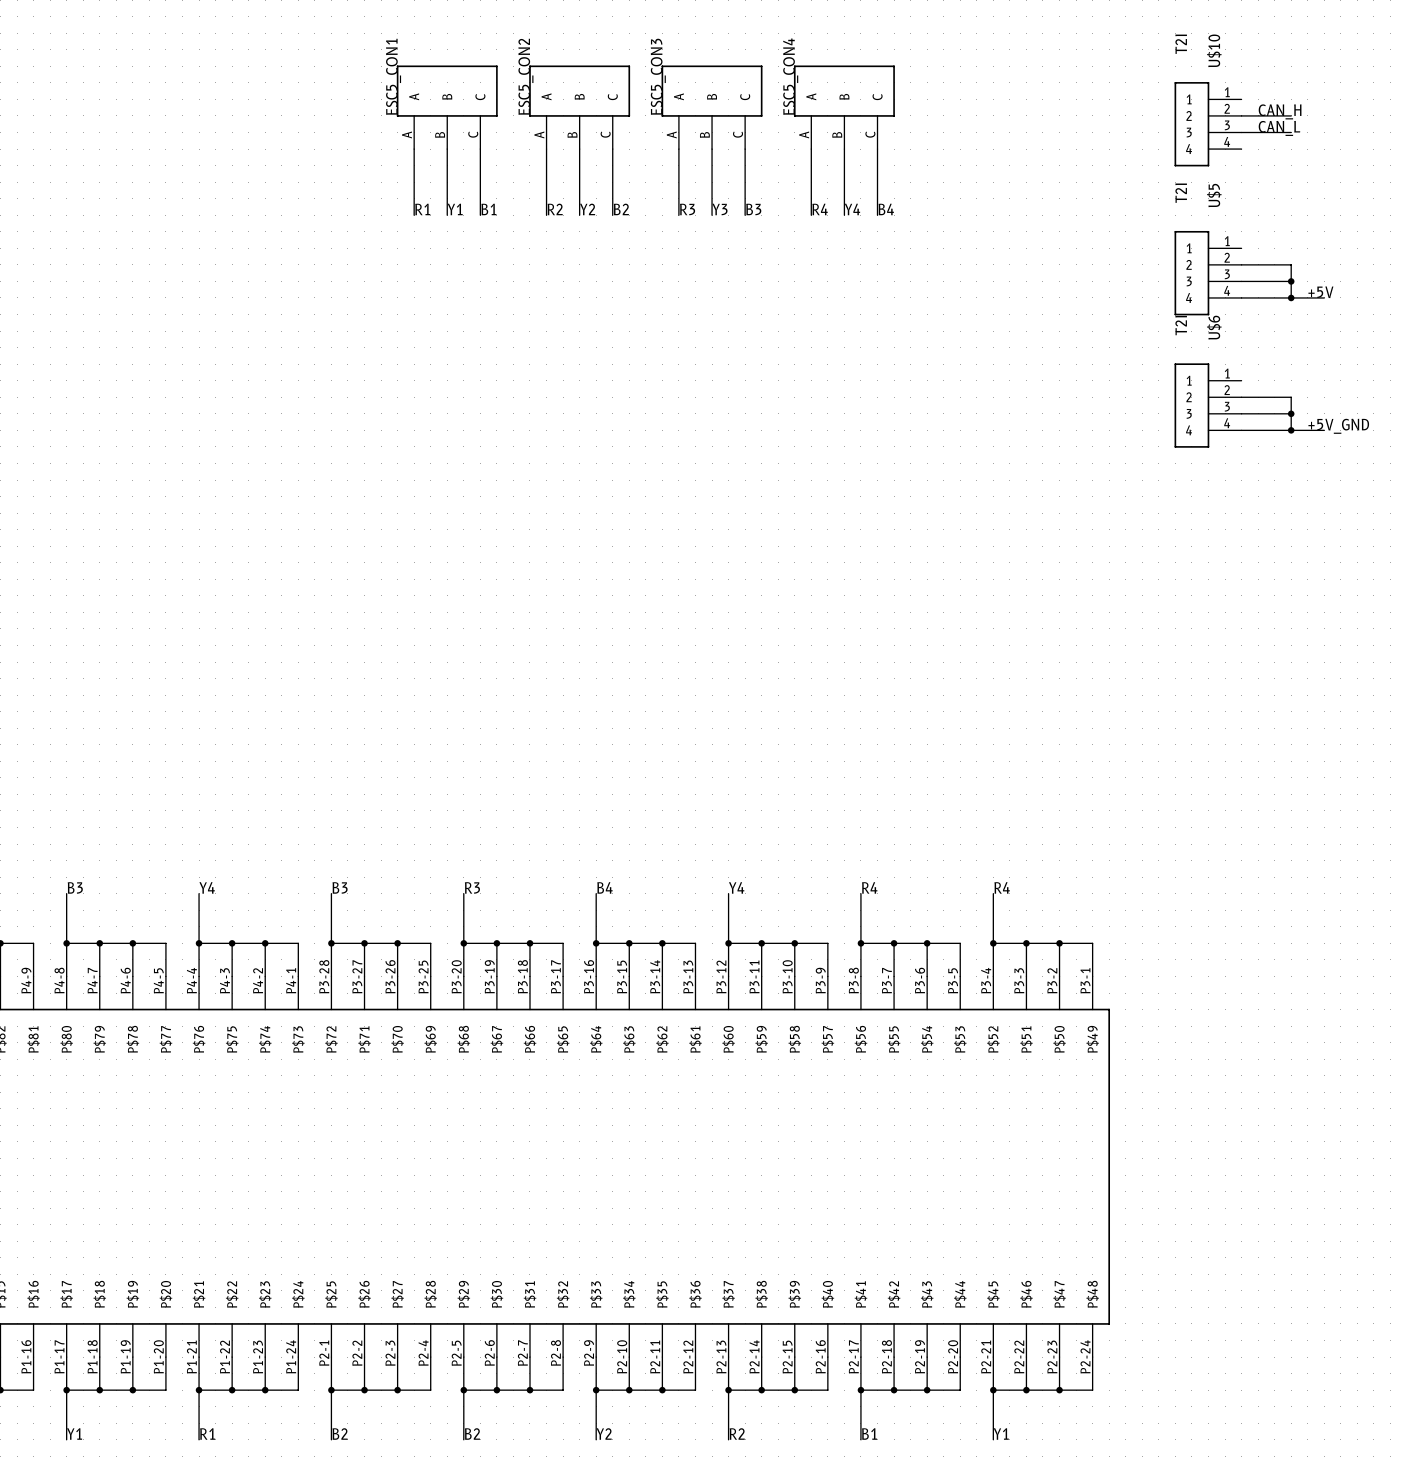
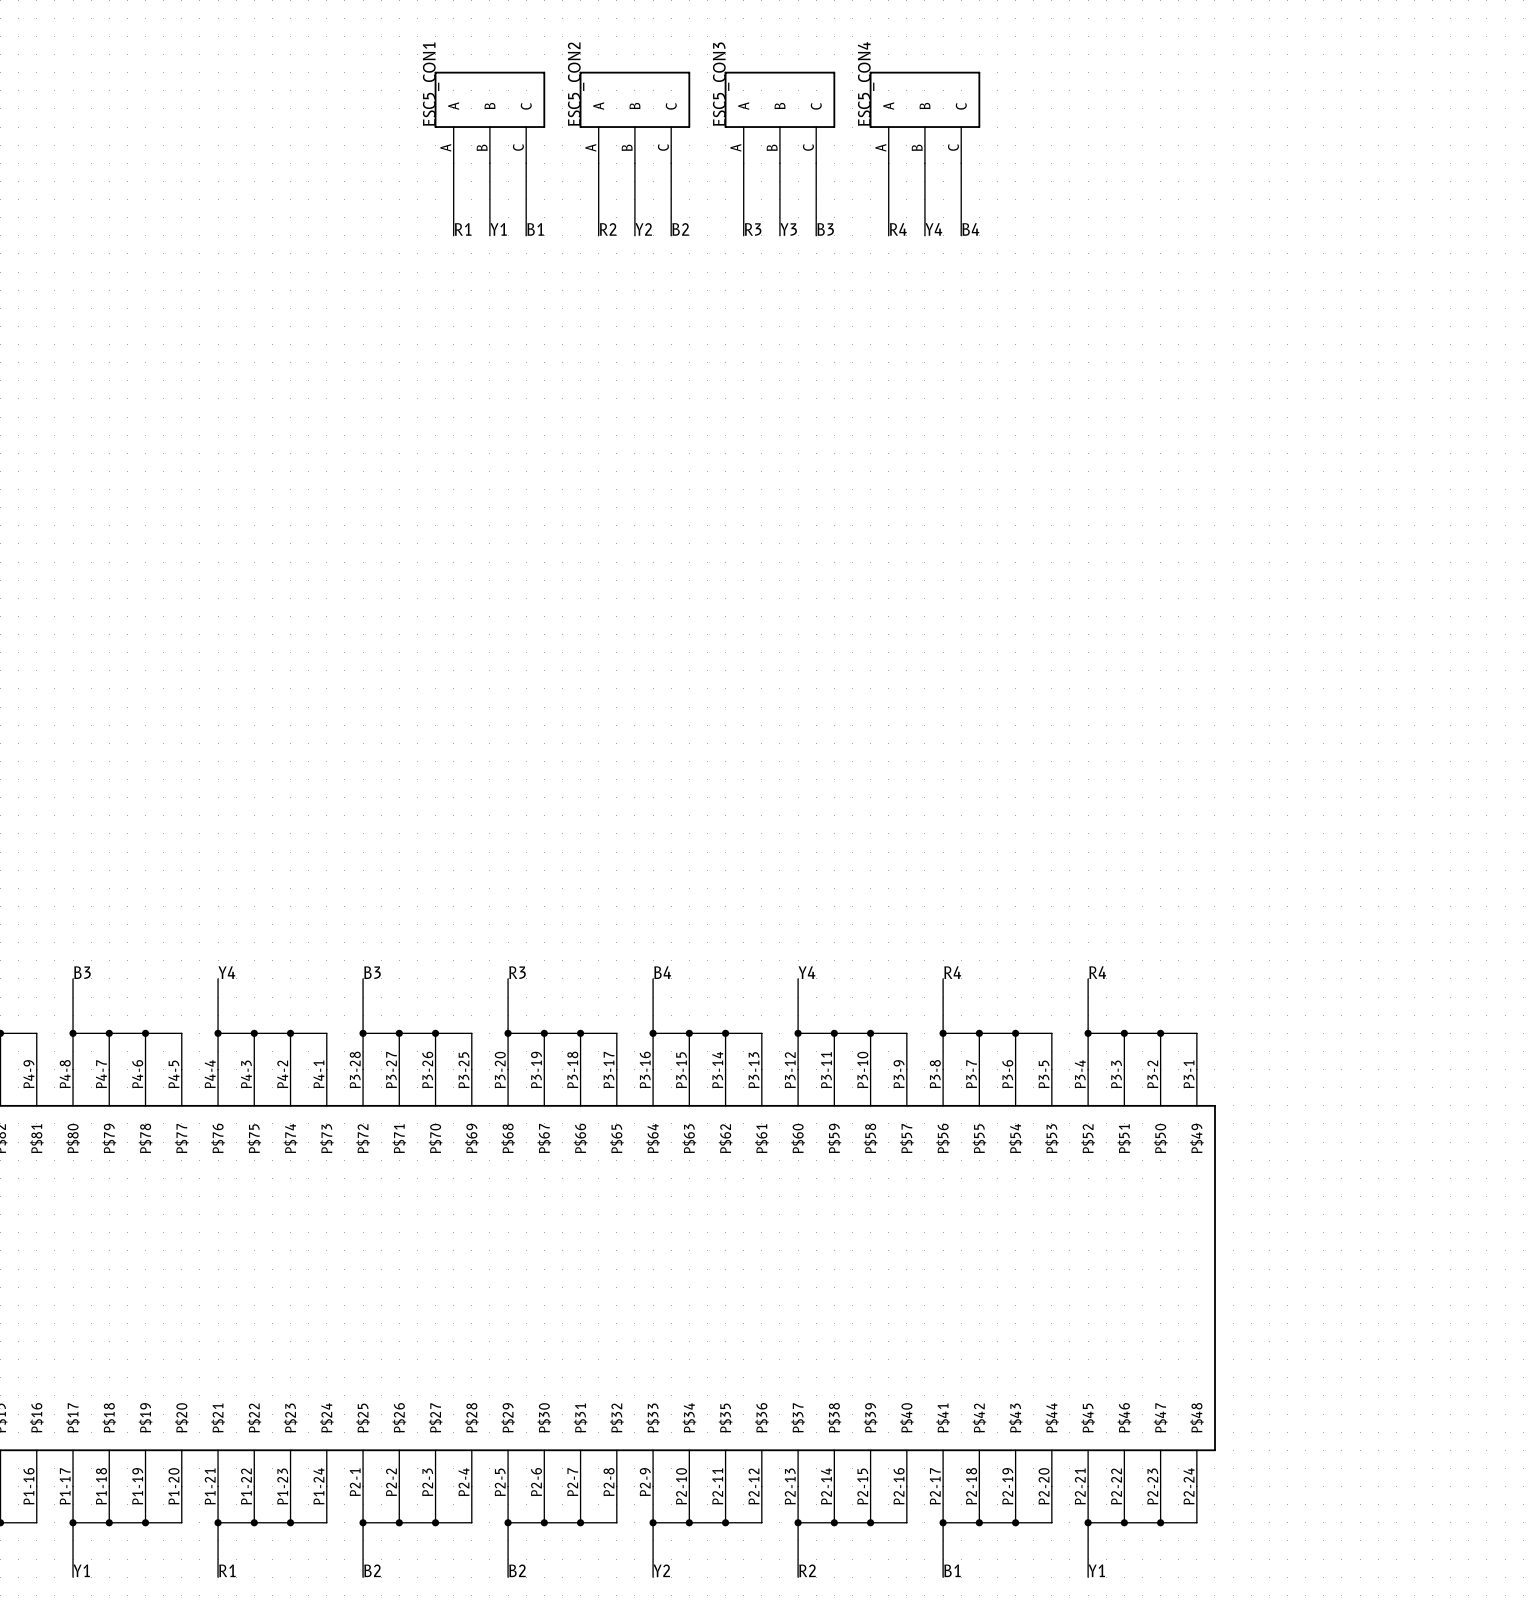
label: CAN_H (1280, 111) -> none
wire: (1241, 115) (1291, 115) -> none
U$10: T2I (1208, 124) -> none
label: CAN_L (1279, 128) -> none
wire: (1241, 132) (1291, 132) -> none
wire: (1241, 264) (1291, 264) (1291, 297) -> none
U$5: T2I (1208, 273) -> none
wire: (1241, 281) (1291, 281) -> none
junction: (1291, 281) -> none
label: +5V (1320, 292) -> none
wire: (1241, 297) (1324, 297) -> none
junction: (1291, 297) -> none
wire: (1241, 397) (1291, 397) (1291, 430) -> none
U$6: T2I (1208, 405) -> none
wire: (1241, 413) (1291, 413) -> none
junction: (1291, 413) -> none
label: +5V_GND (1338, 426) -> none
wire: (1241, 430) (1324, 430) -> none
junction: (1291, 430) -> none

